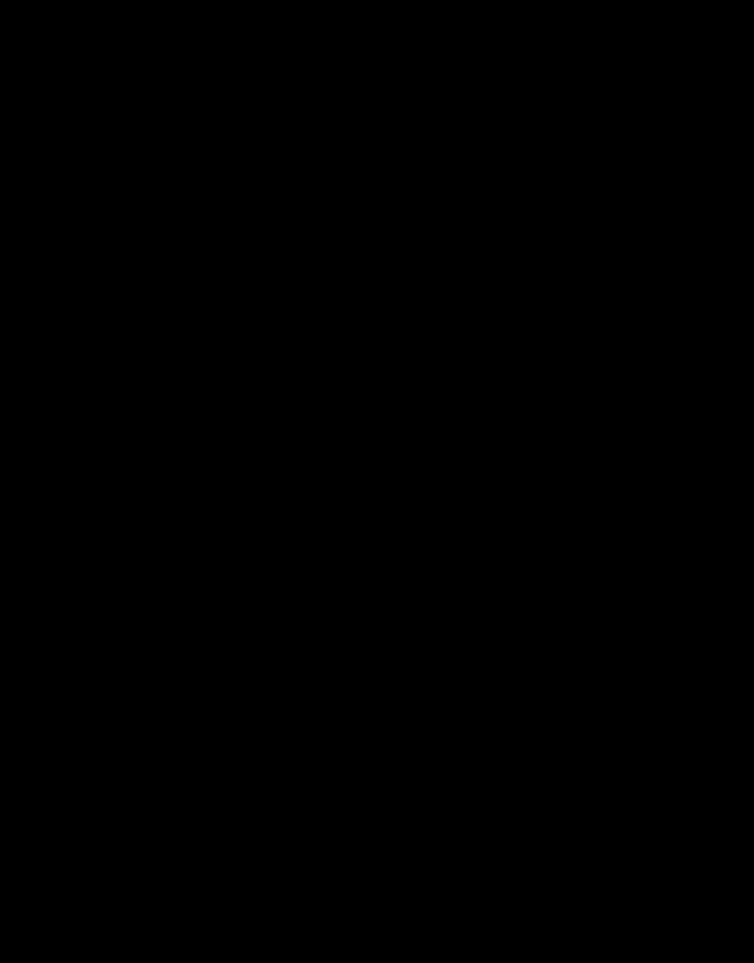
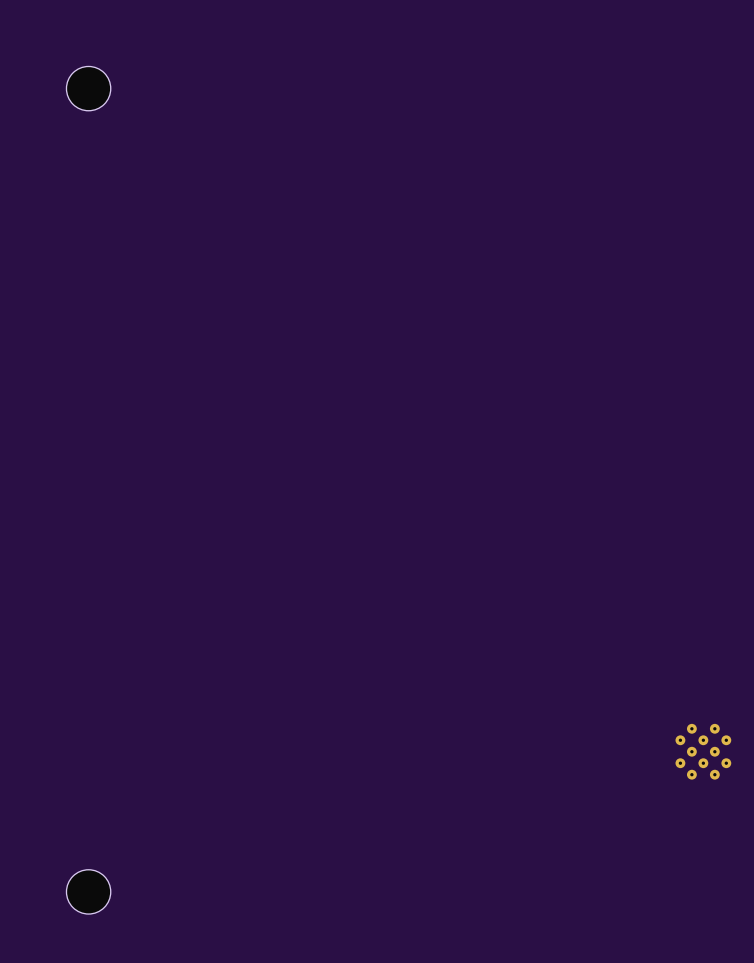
part: none -> (88, 88)
part: none -> (703, 751)
part: none -> (88, 891)

